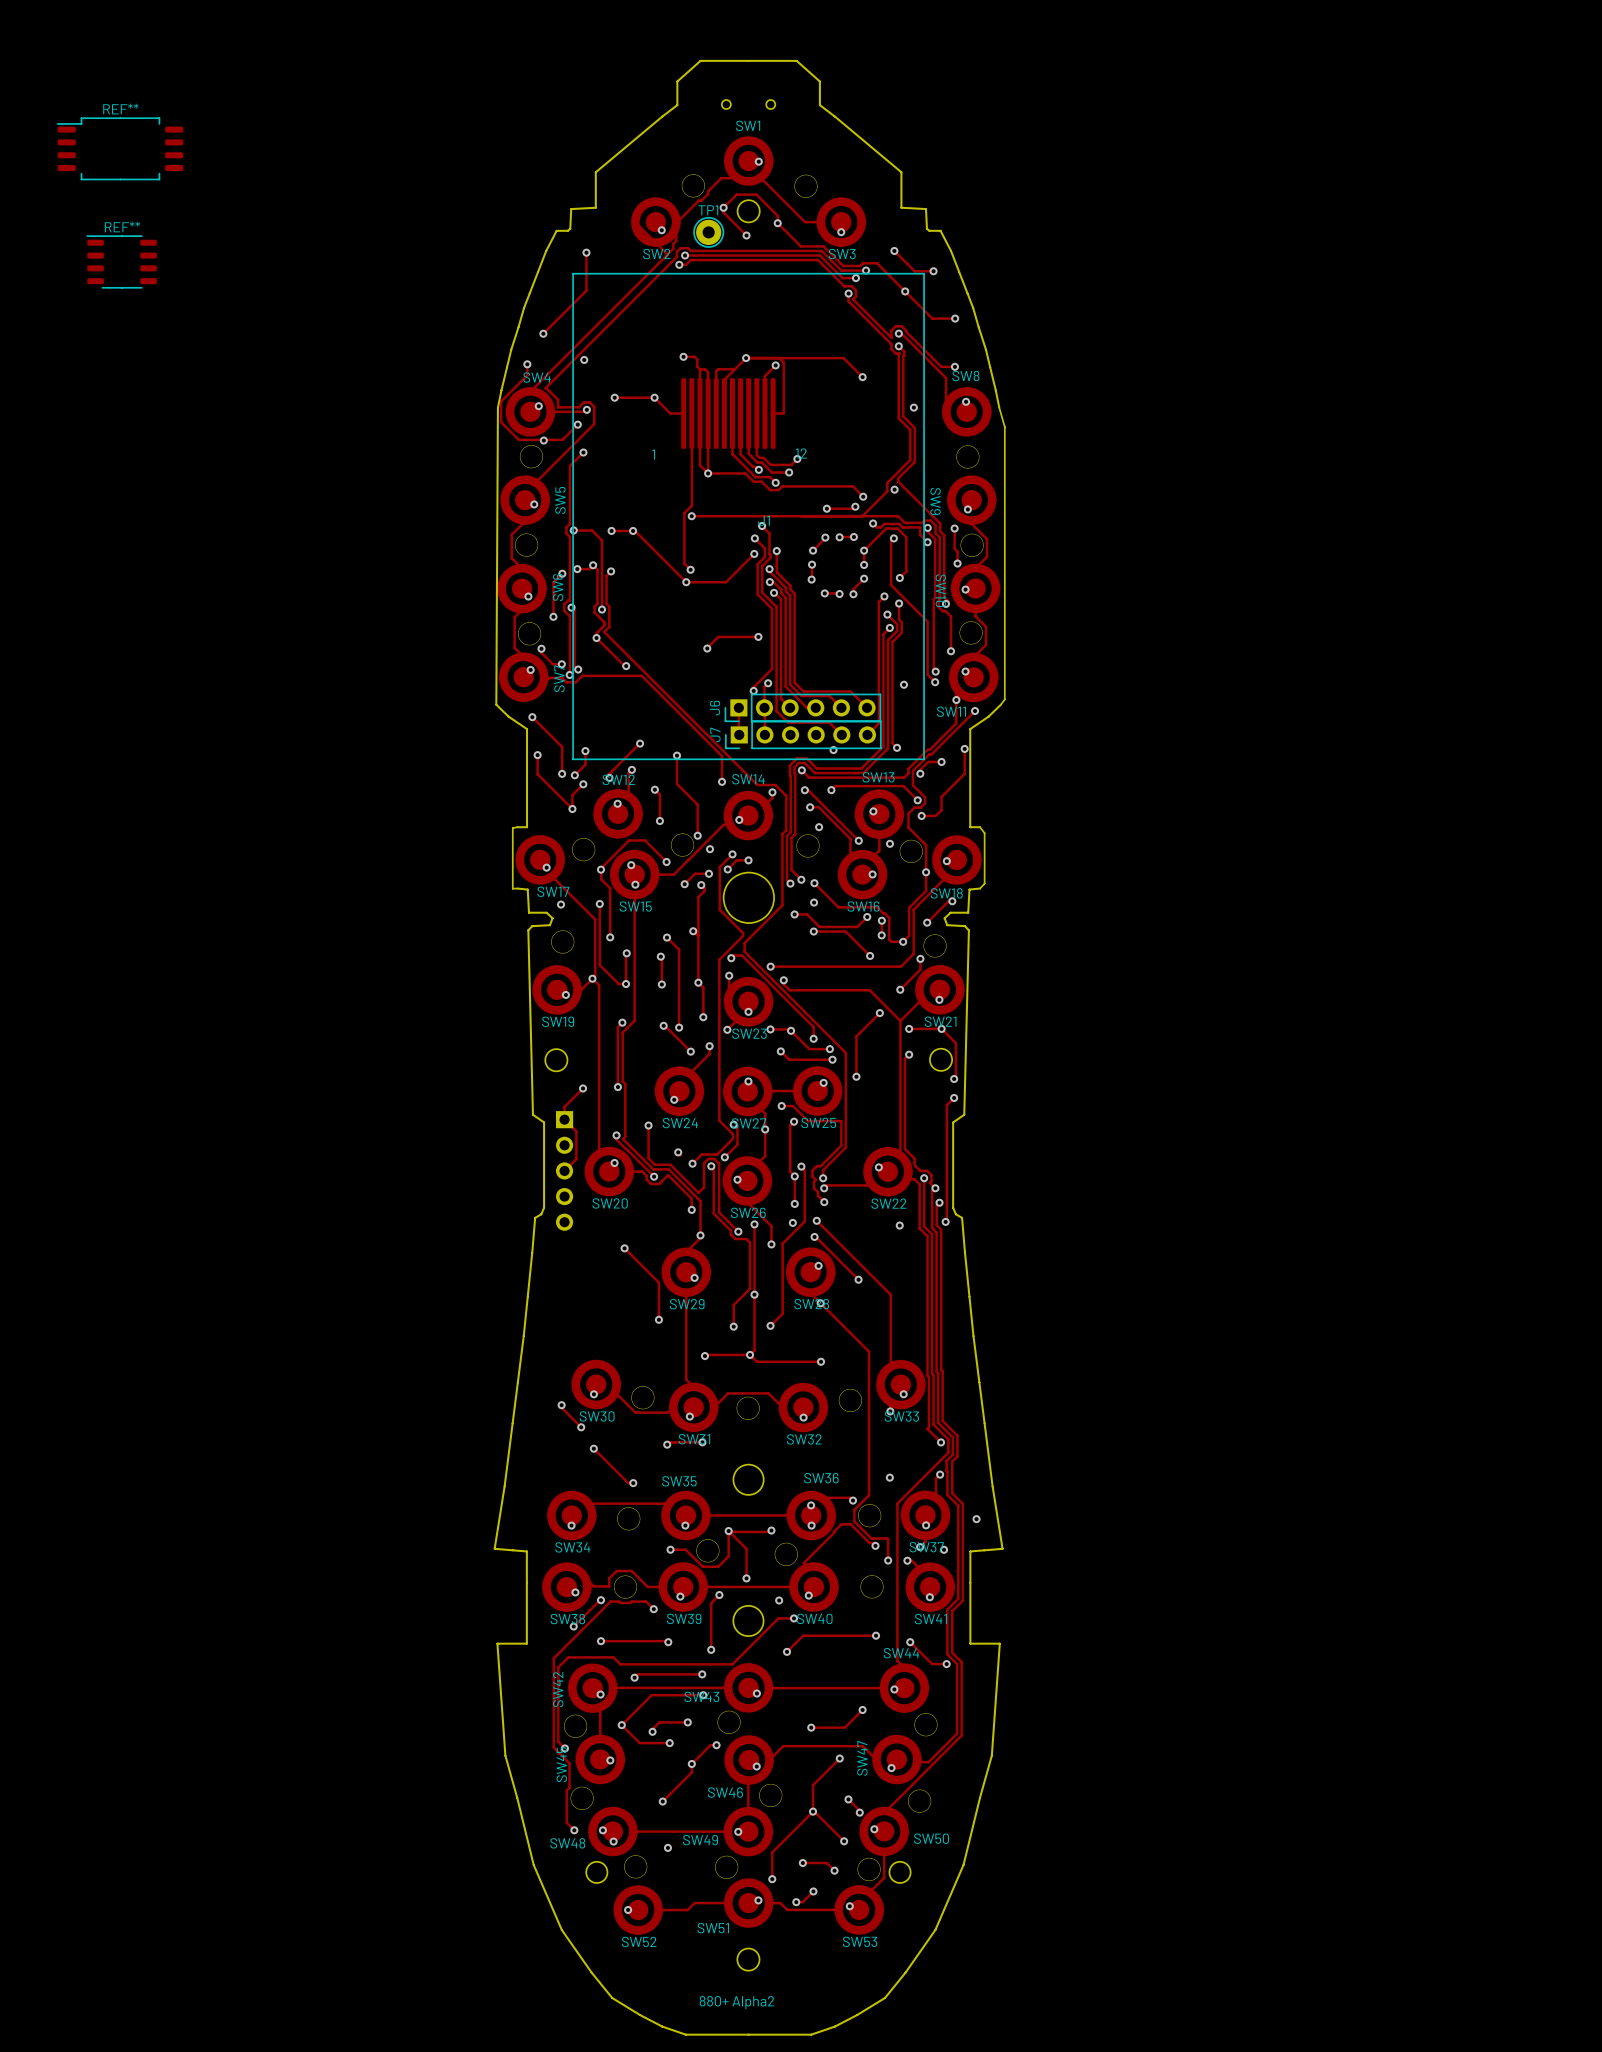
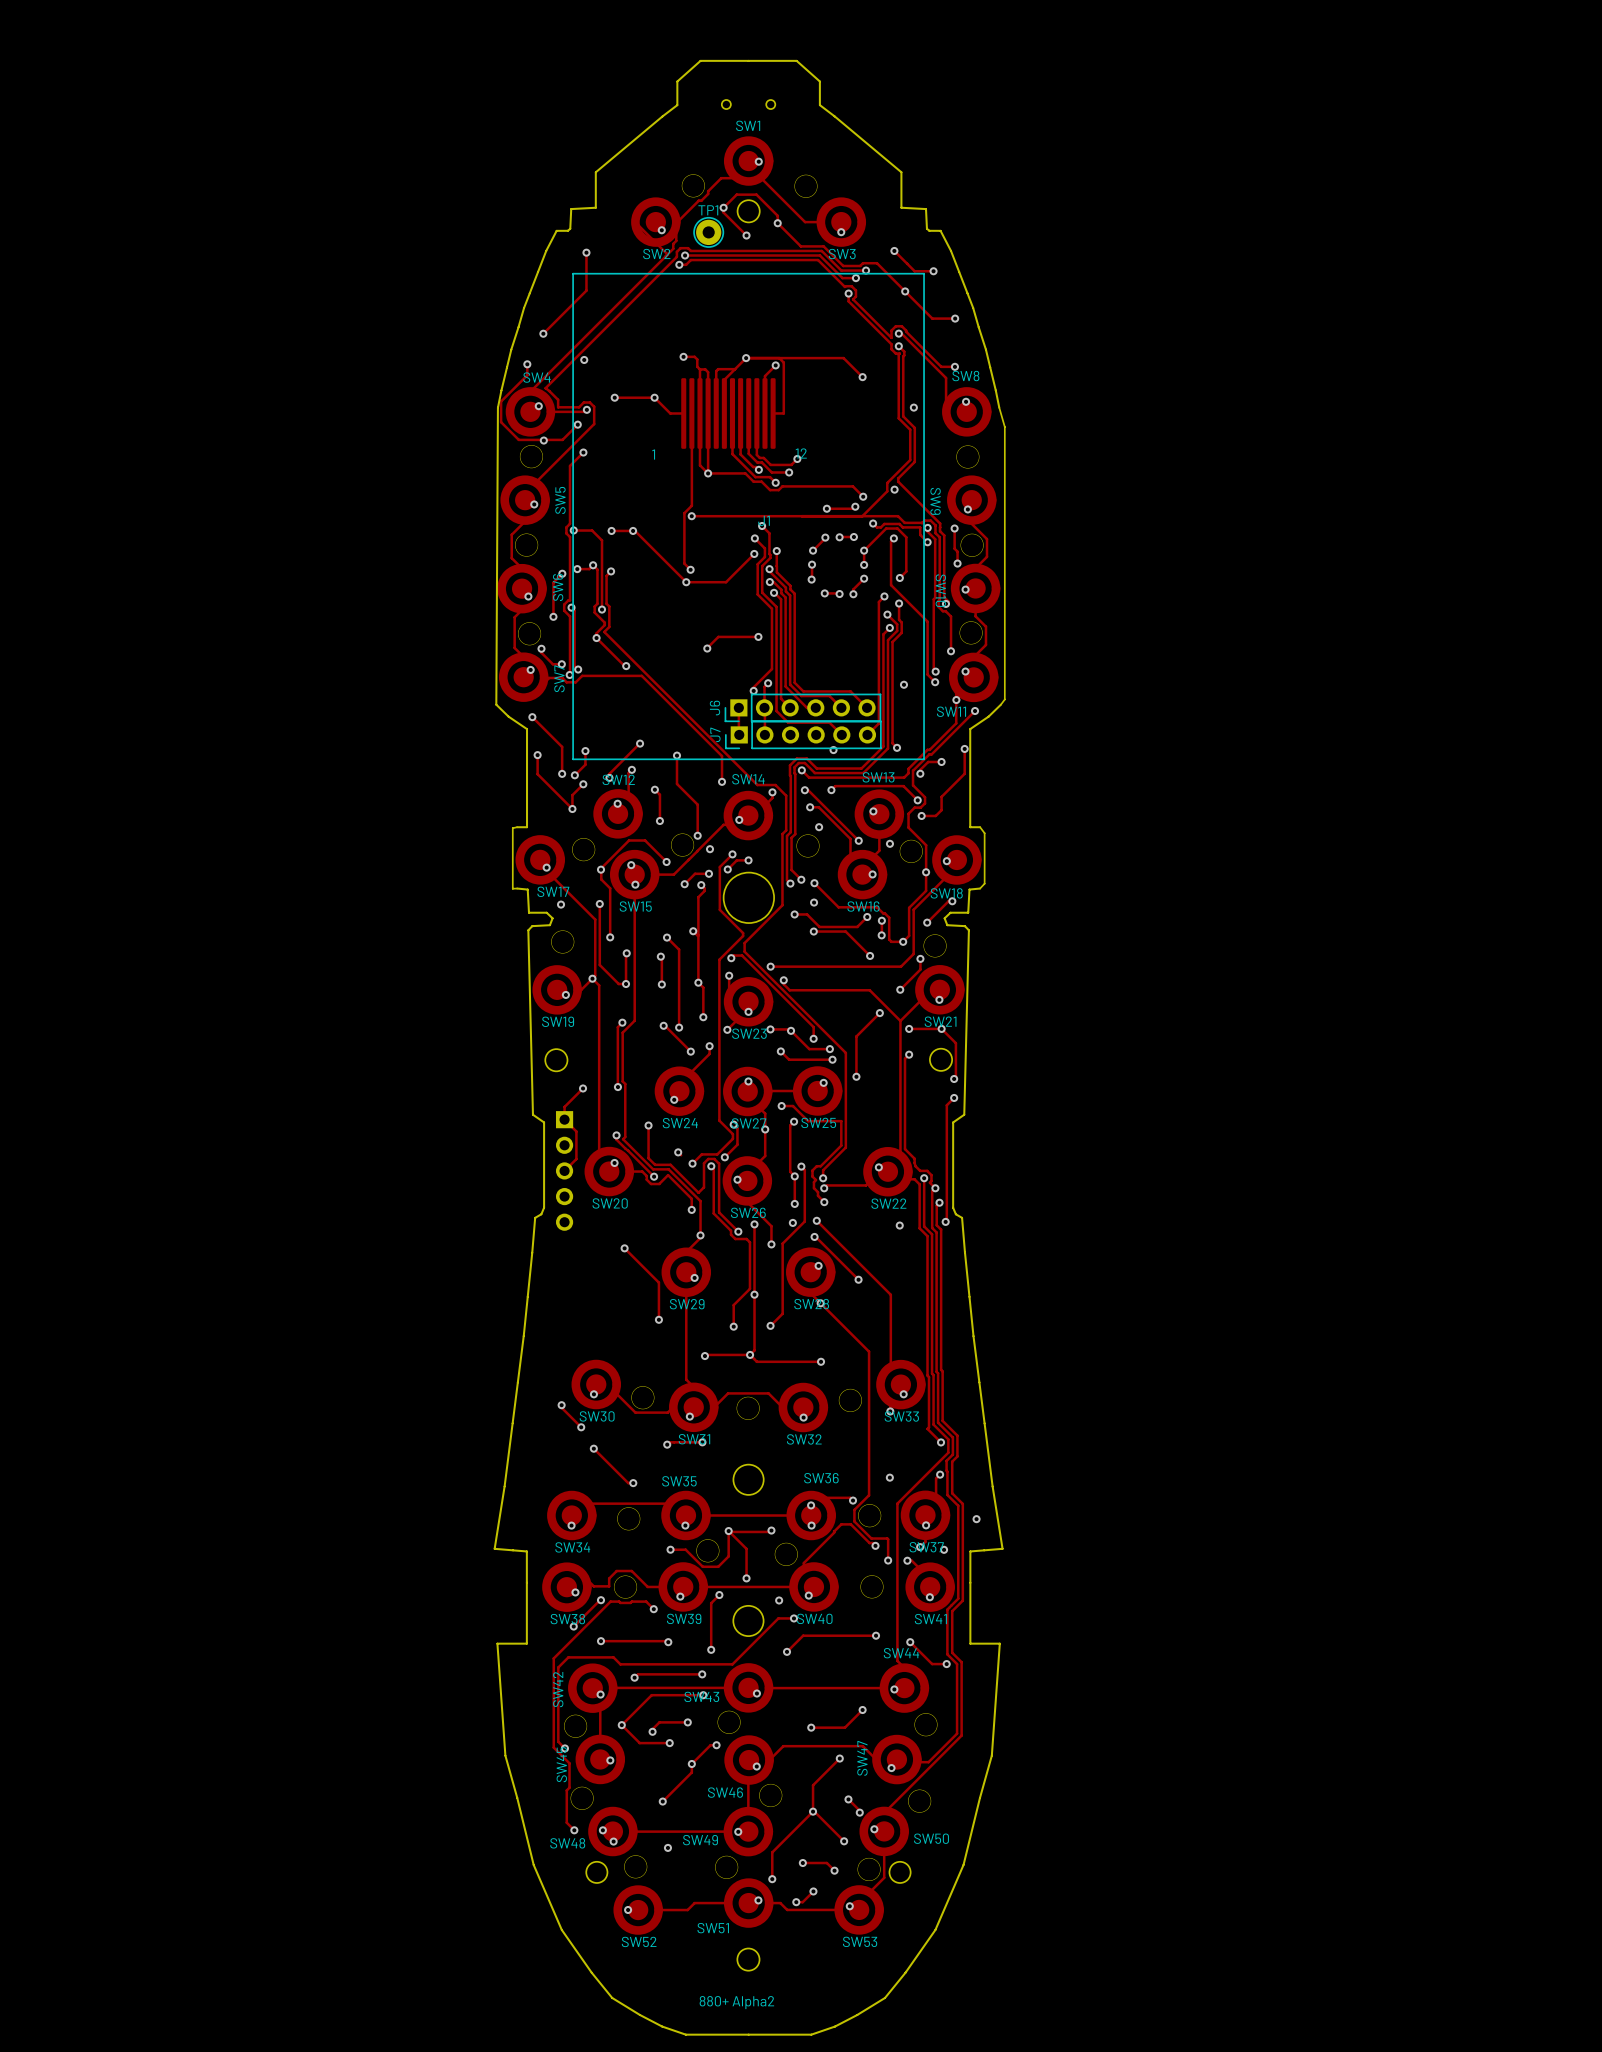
REF**: (120, 148) -> none
REF**: (121, 261) -> none

